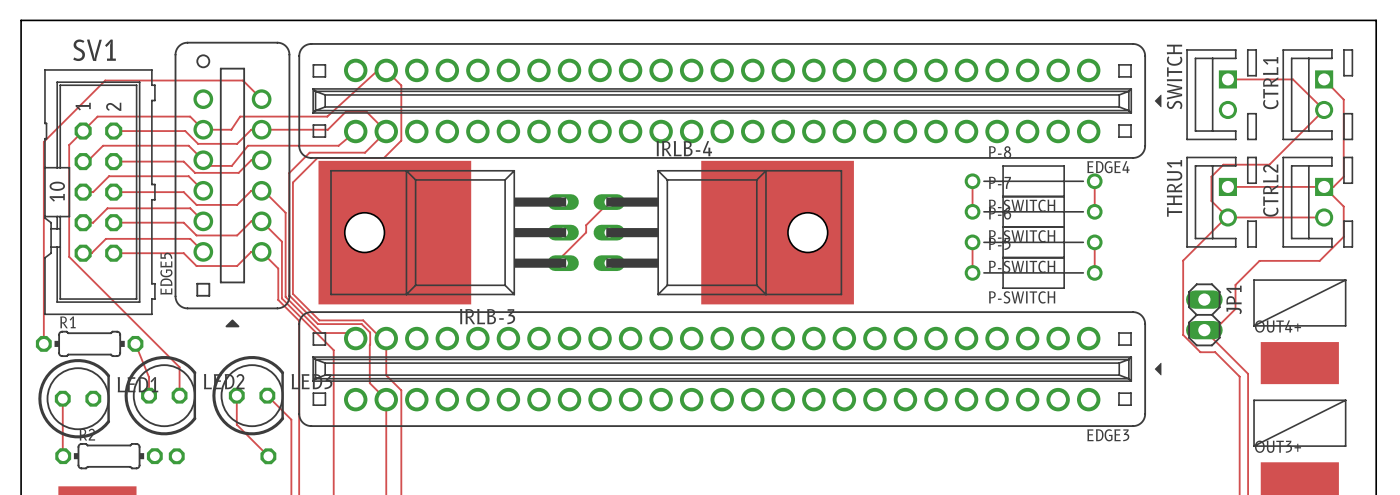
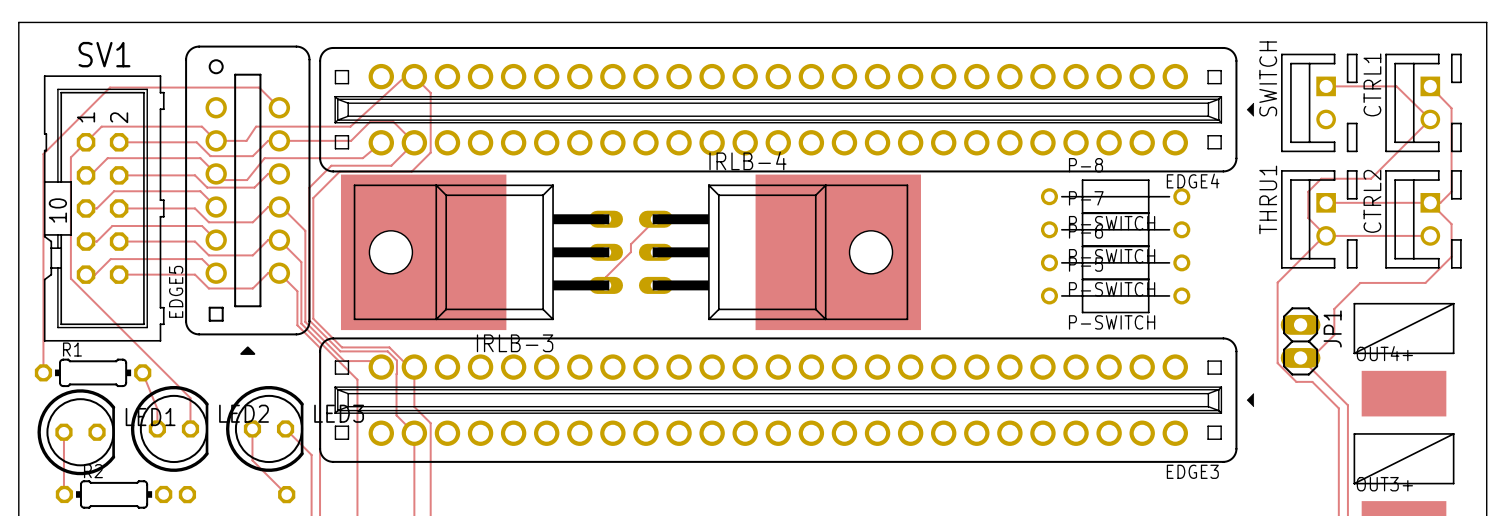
track: (972, 181) (972, 211) -> none
track: (1094, 181) (1094, 211) -> none
track: (972, 242) (972, 272) -> none
track: (1094, 242) (1094, 272) -> none

